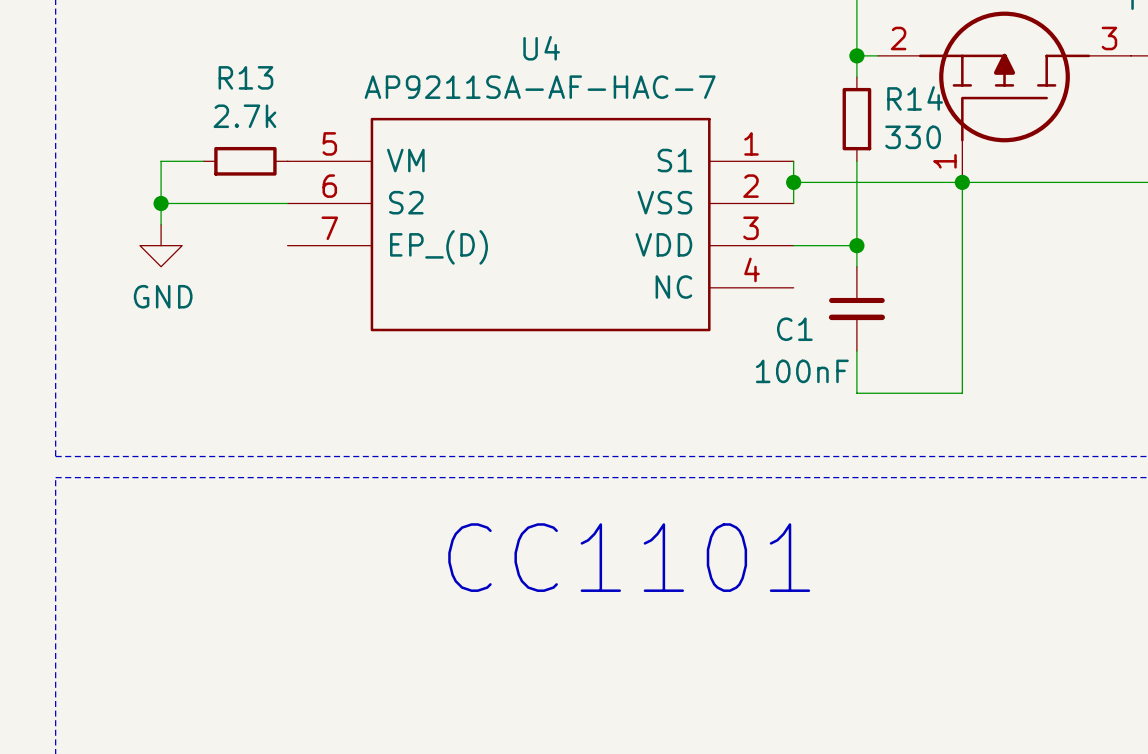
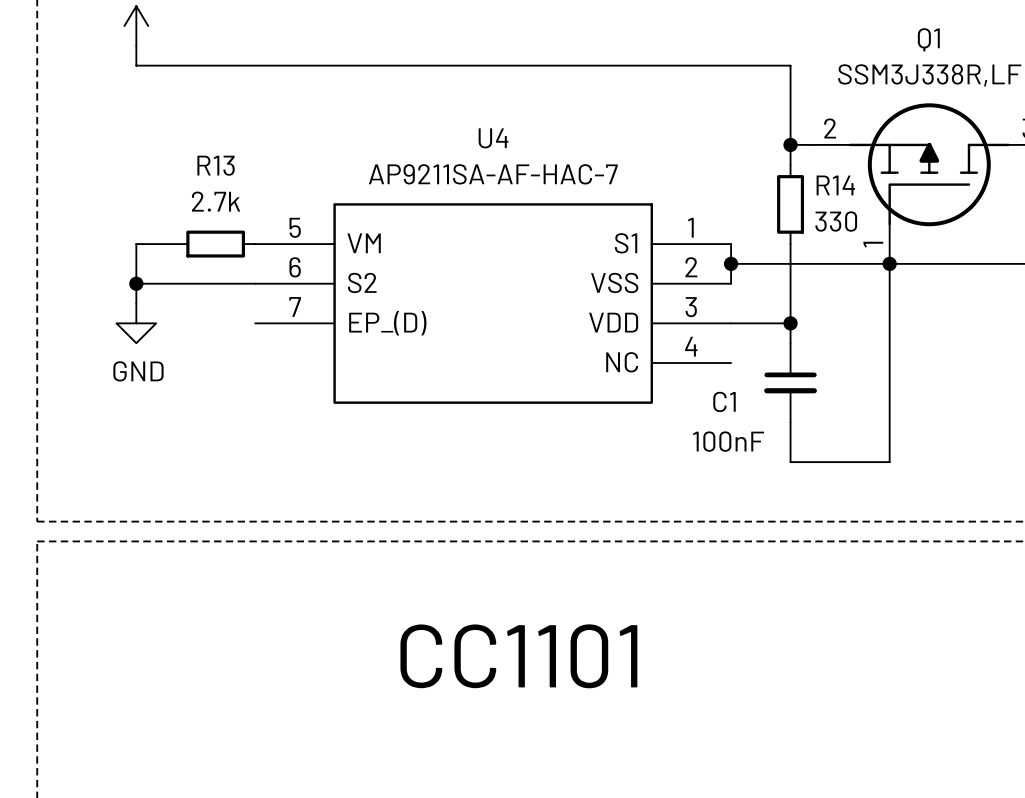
text position: CC1101 (629, 557) -> CC1101 (518, 656)

